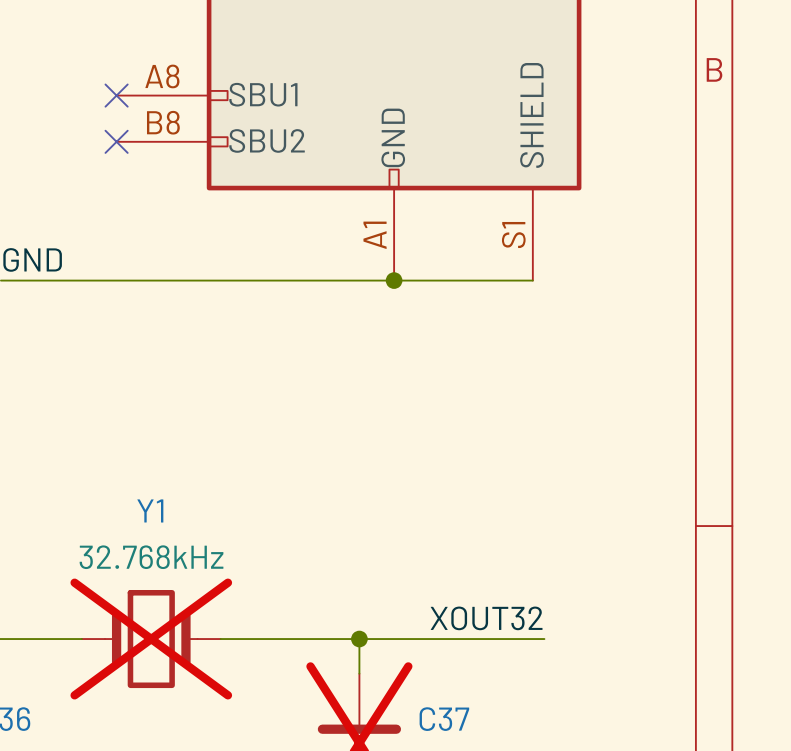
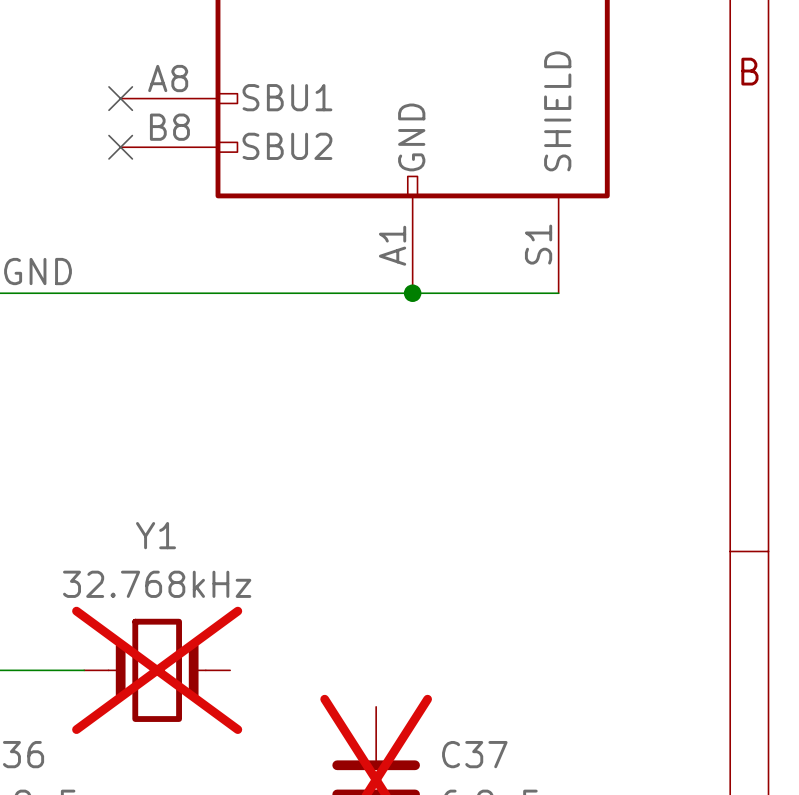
label: XOUT32 (486, 618) -> none
wire: (220, 639) (544, 639) -> none
wire: (359, 639) (359, 673) -> none
junction: (359, 639) -> none

